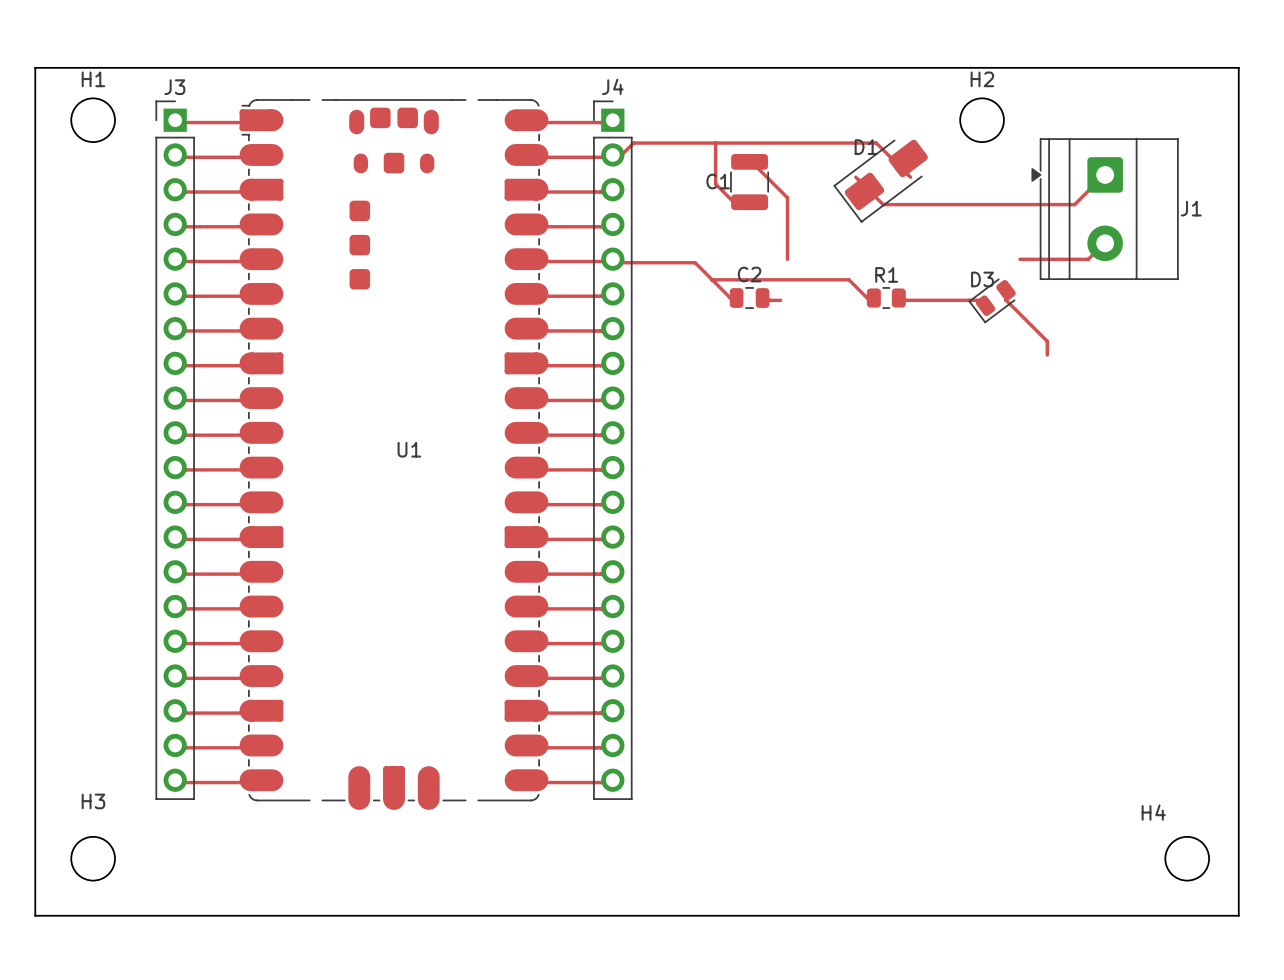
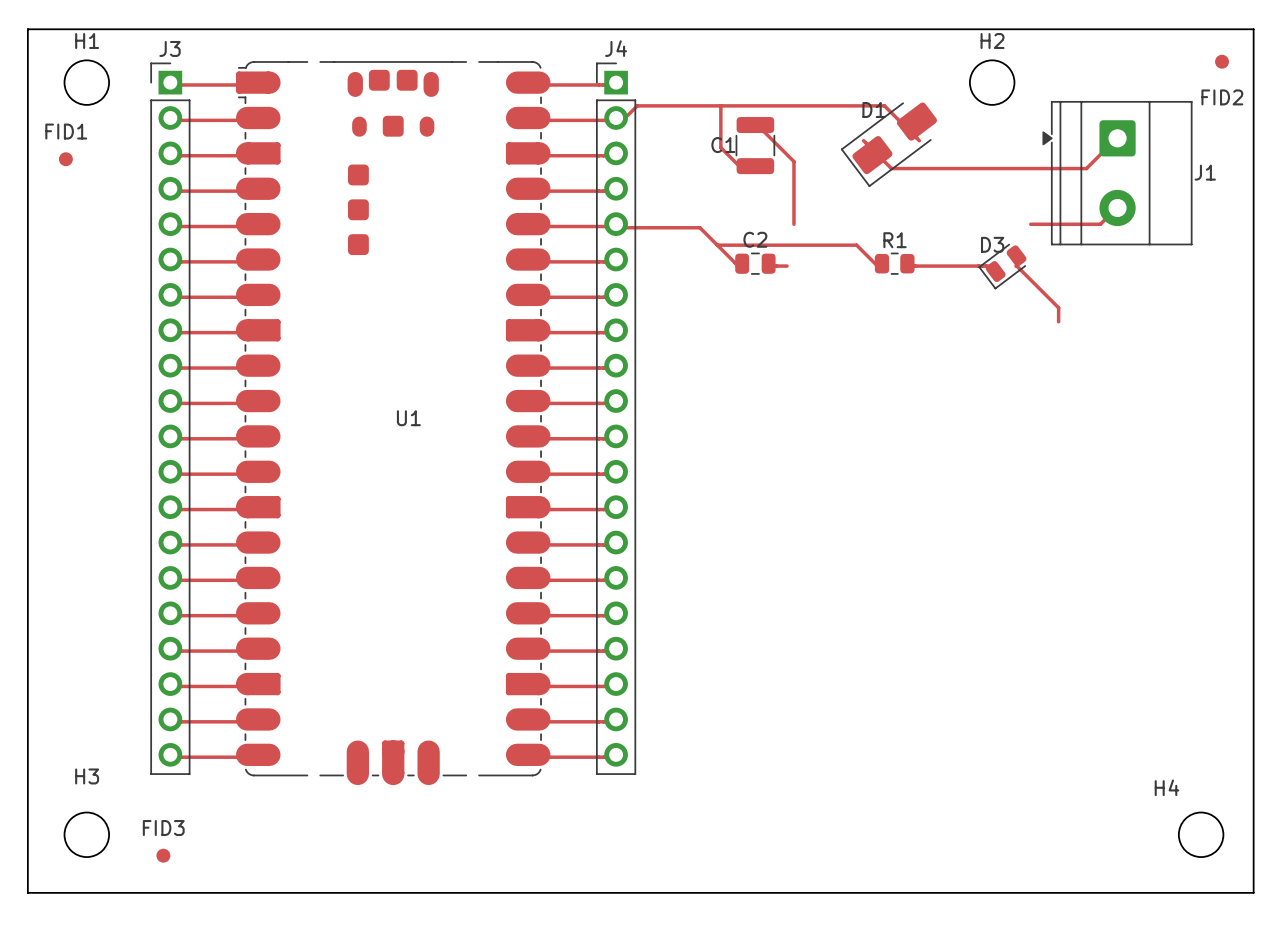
FID2: none -> (1222, 61)
FID1: none -> (65, 159)
FID3: none -> (163, 855)

